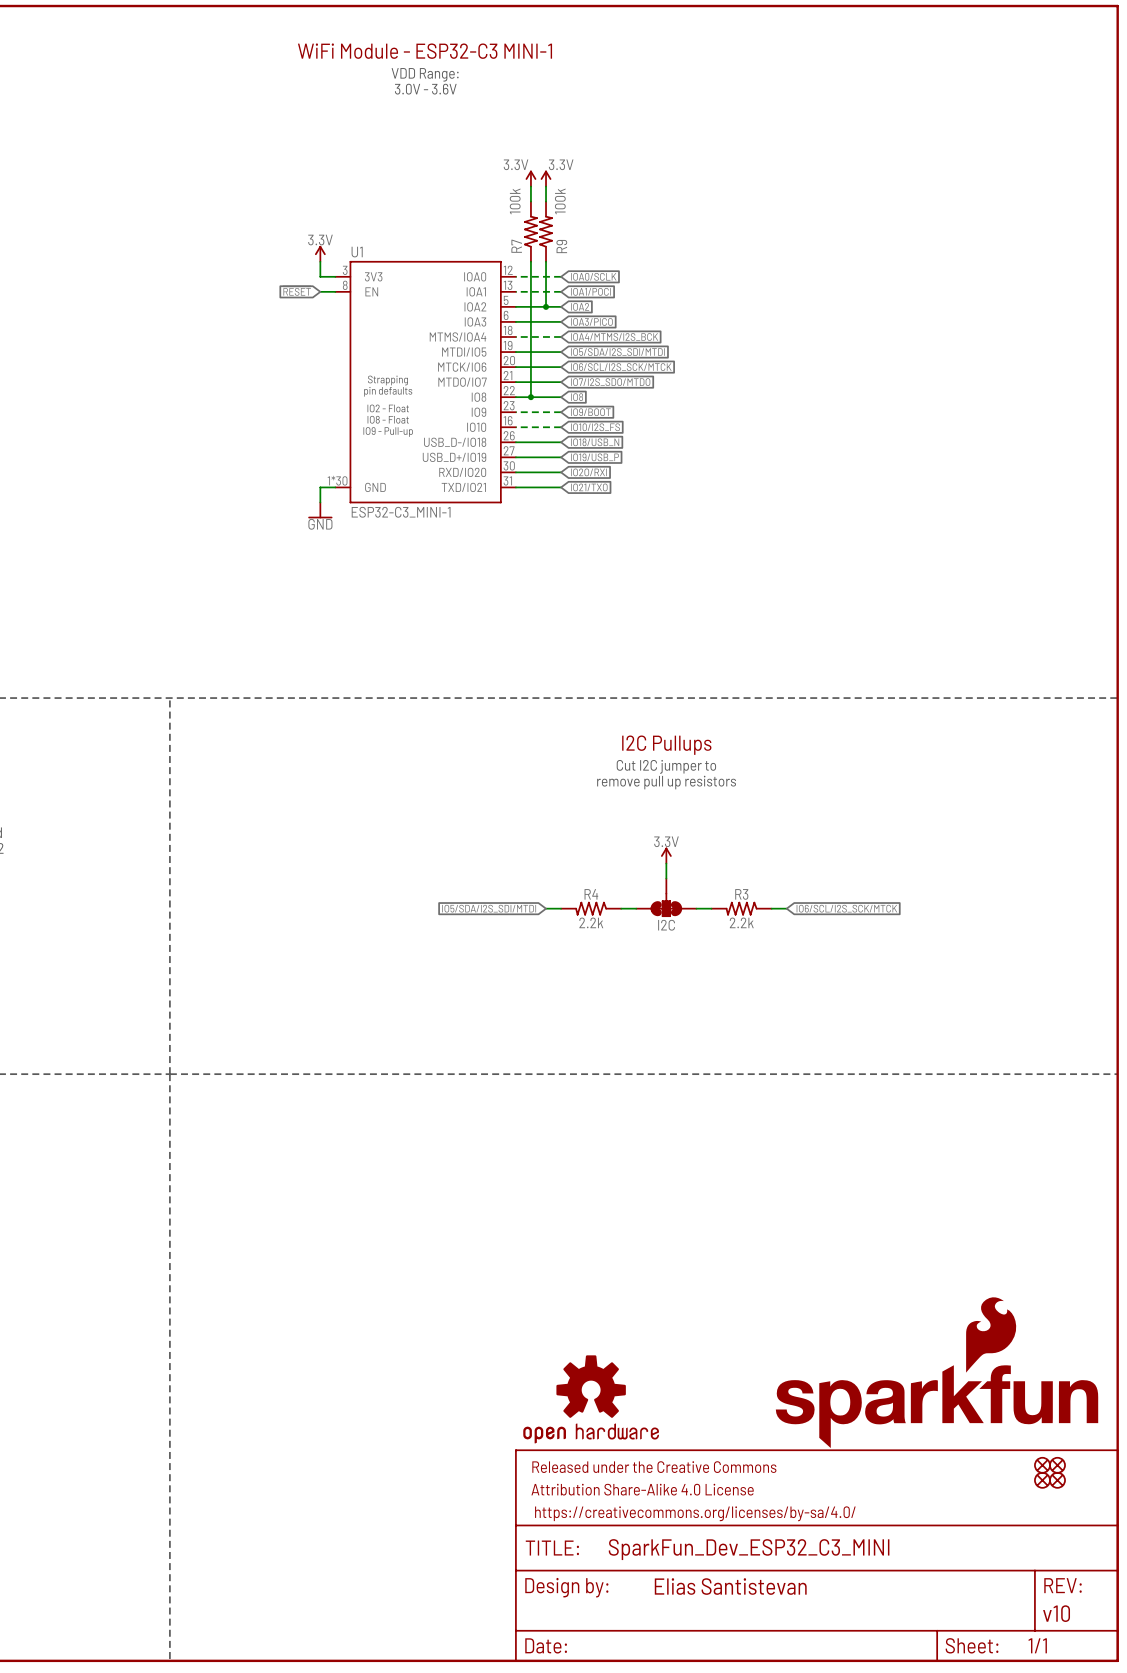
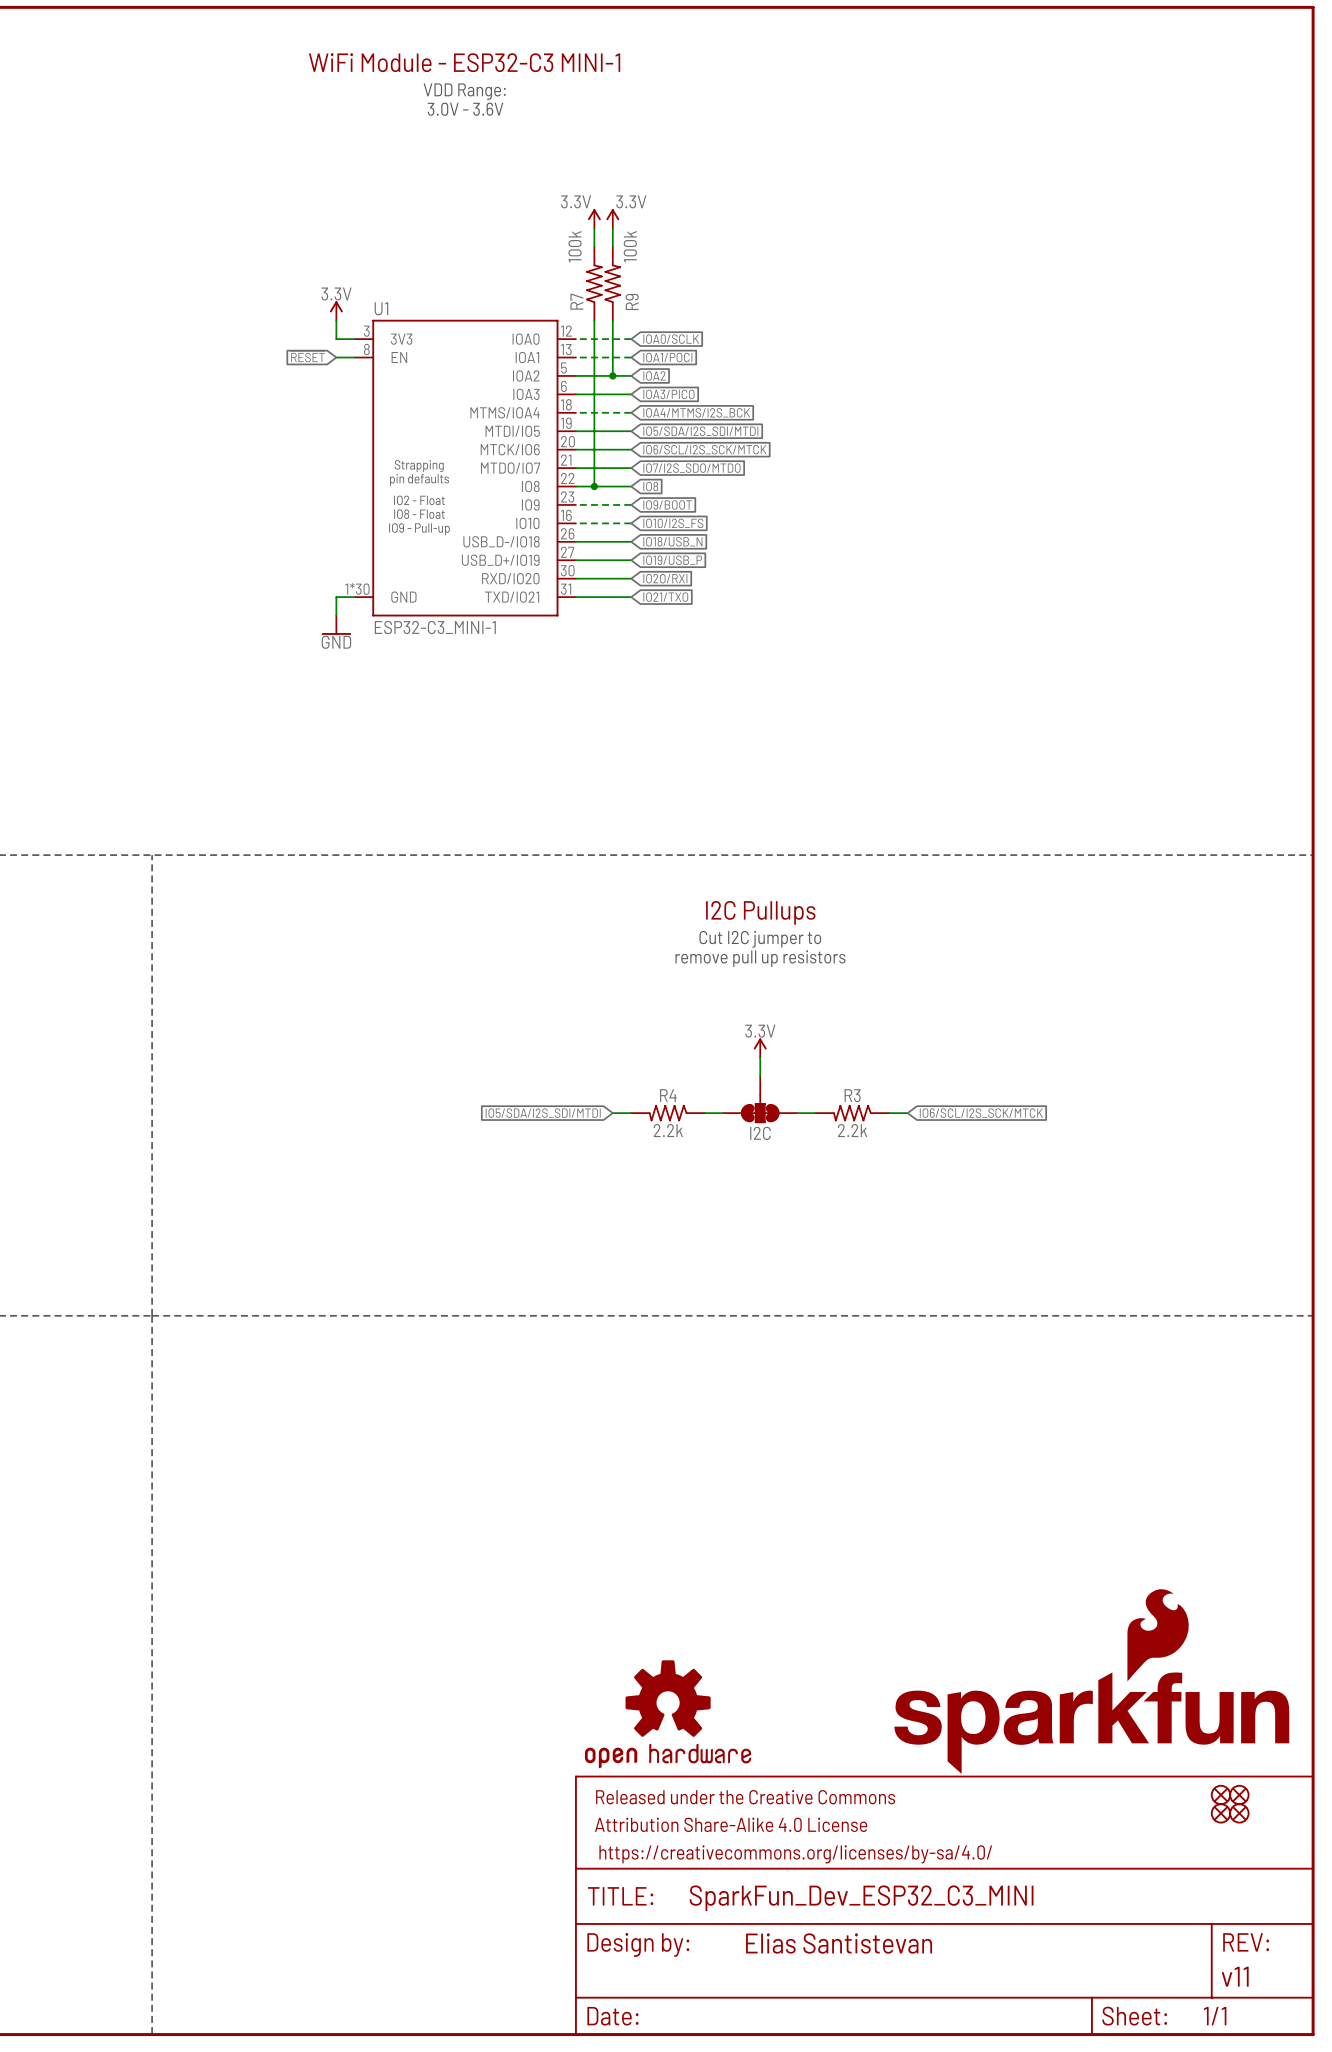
part text: v10 (1056, 1613) -> v11 (1235, 1976)

